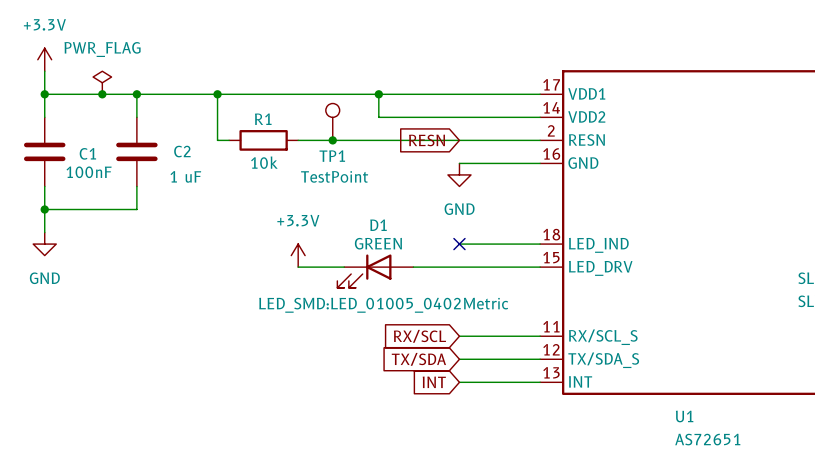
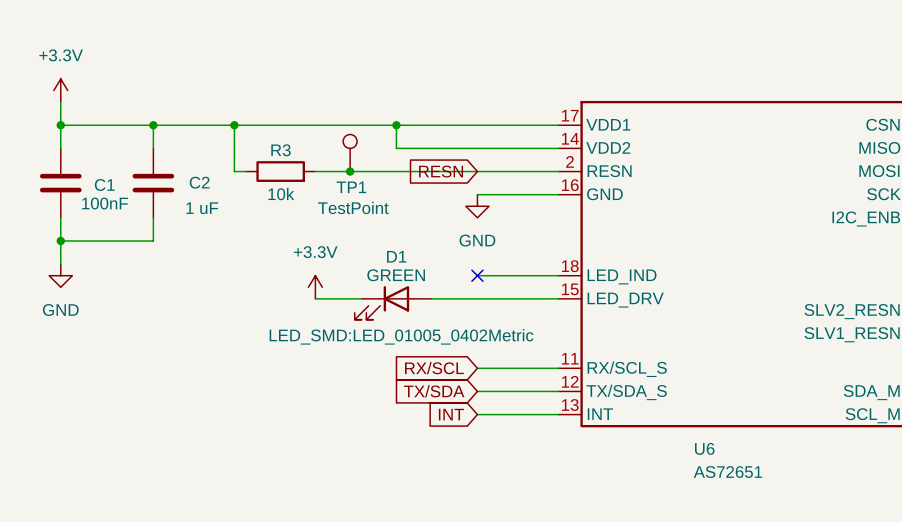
power symbol: PWR_FLAG (102, 82) -> none
junction: (102, 94) -> none
R1 name: R1 (263, 119) -> R3 (281, 150)
U1 name: U1 (684, 416) -> U6 (704, 448)

